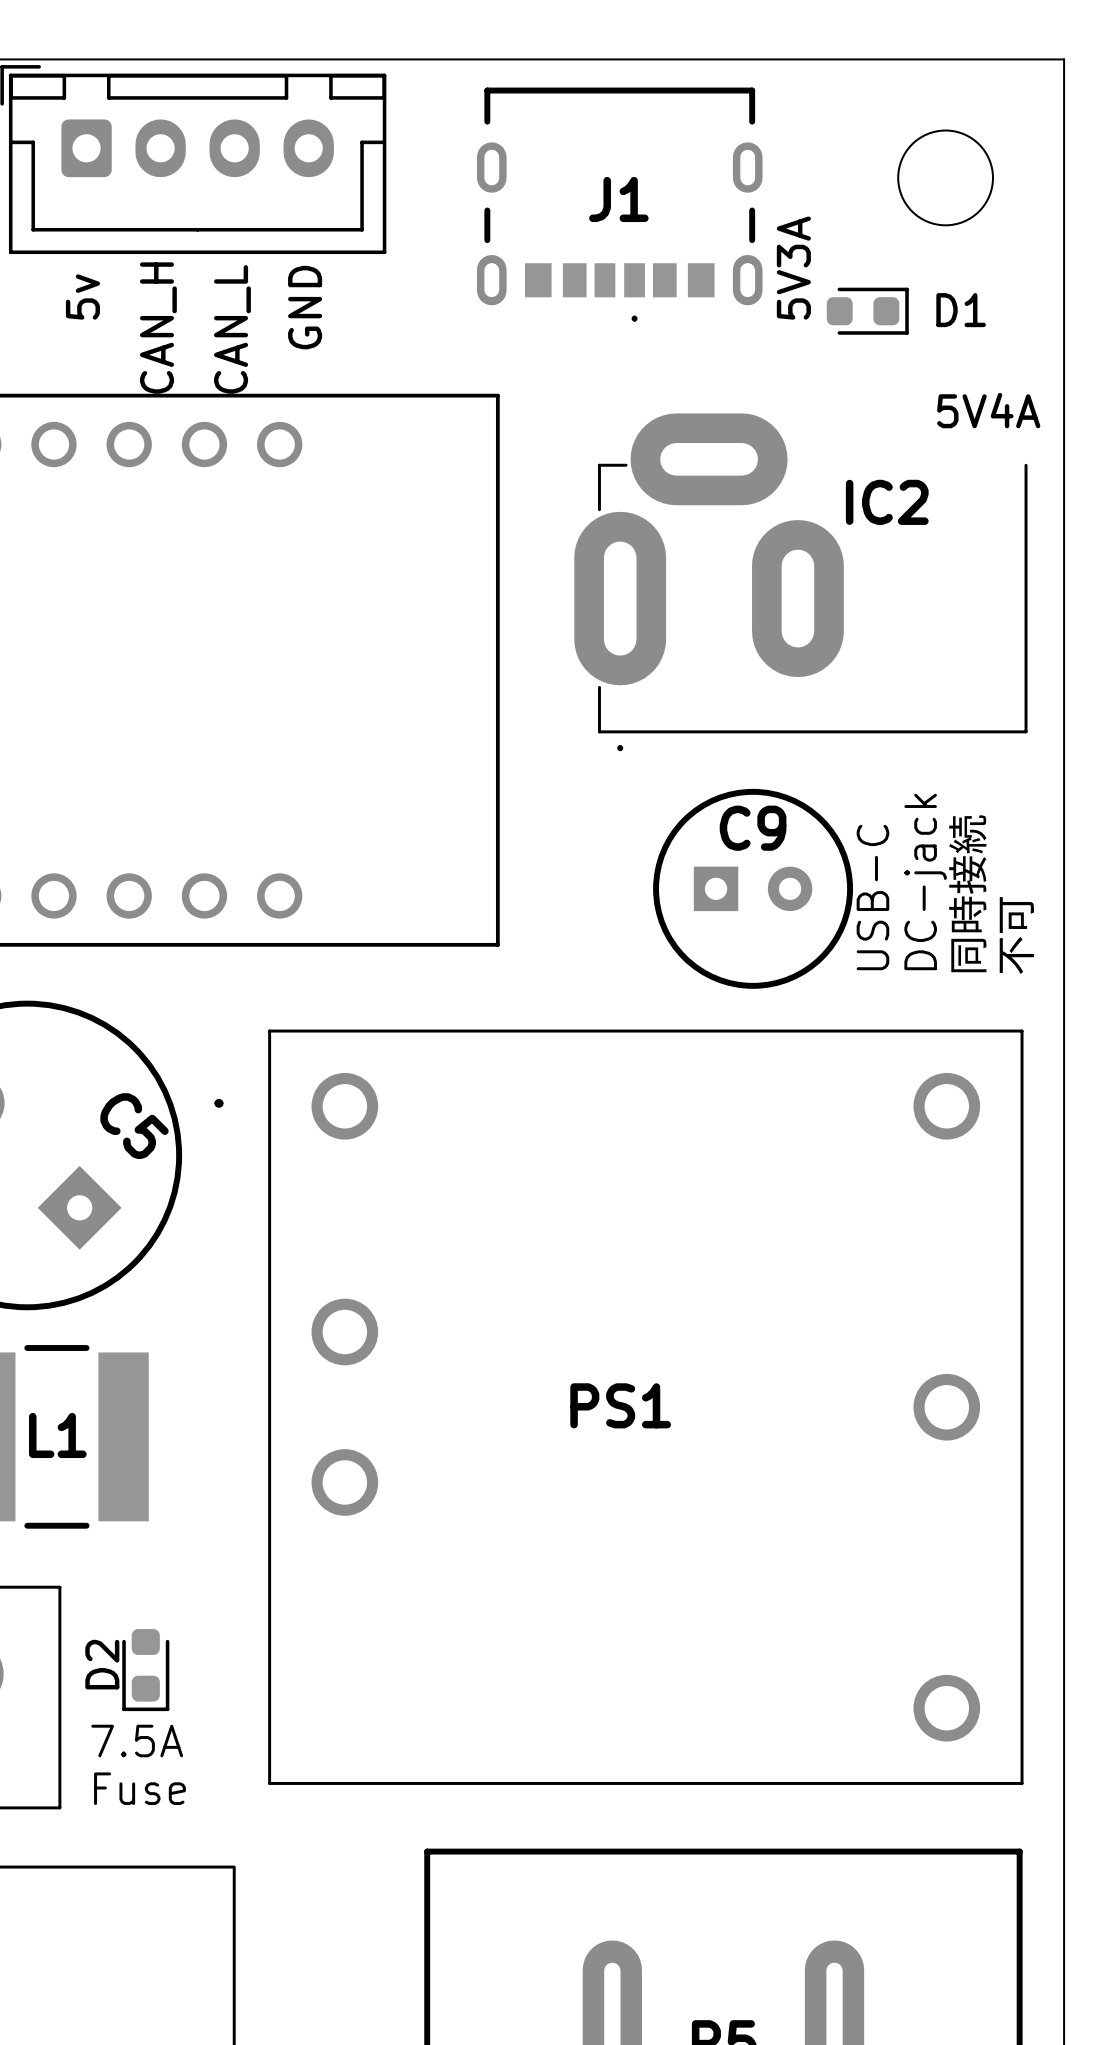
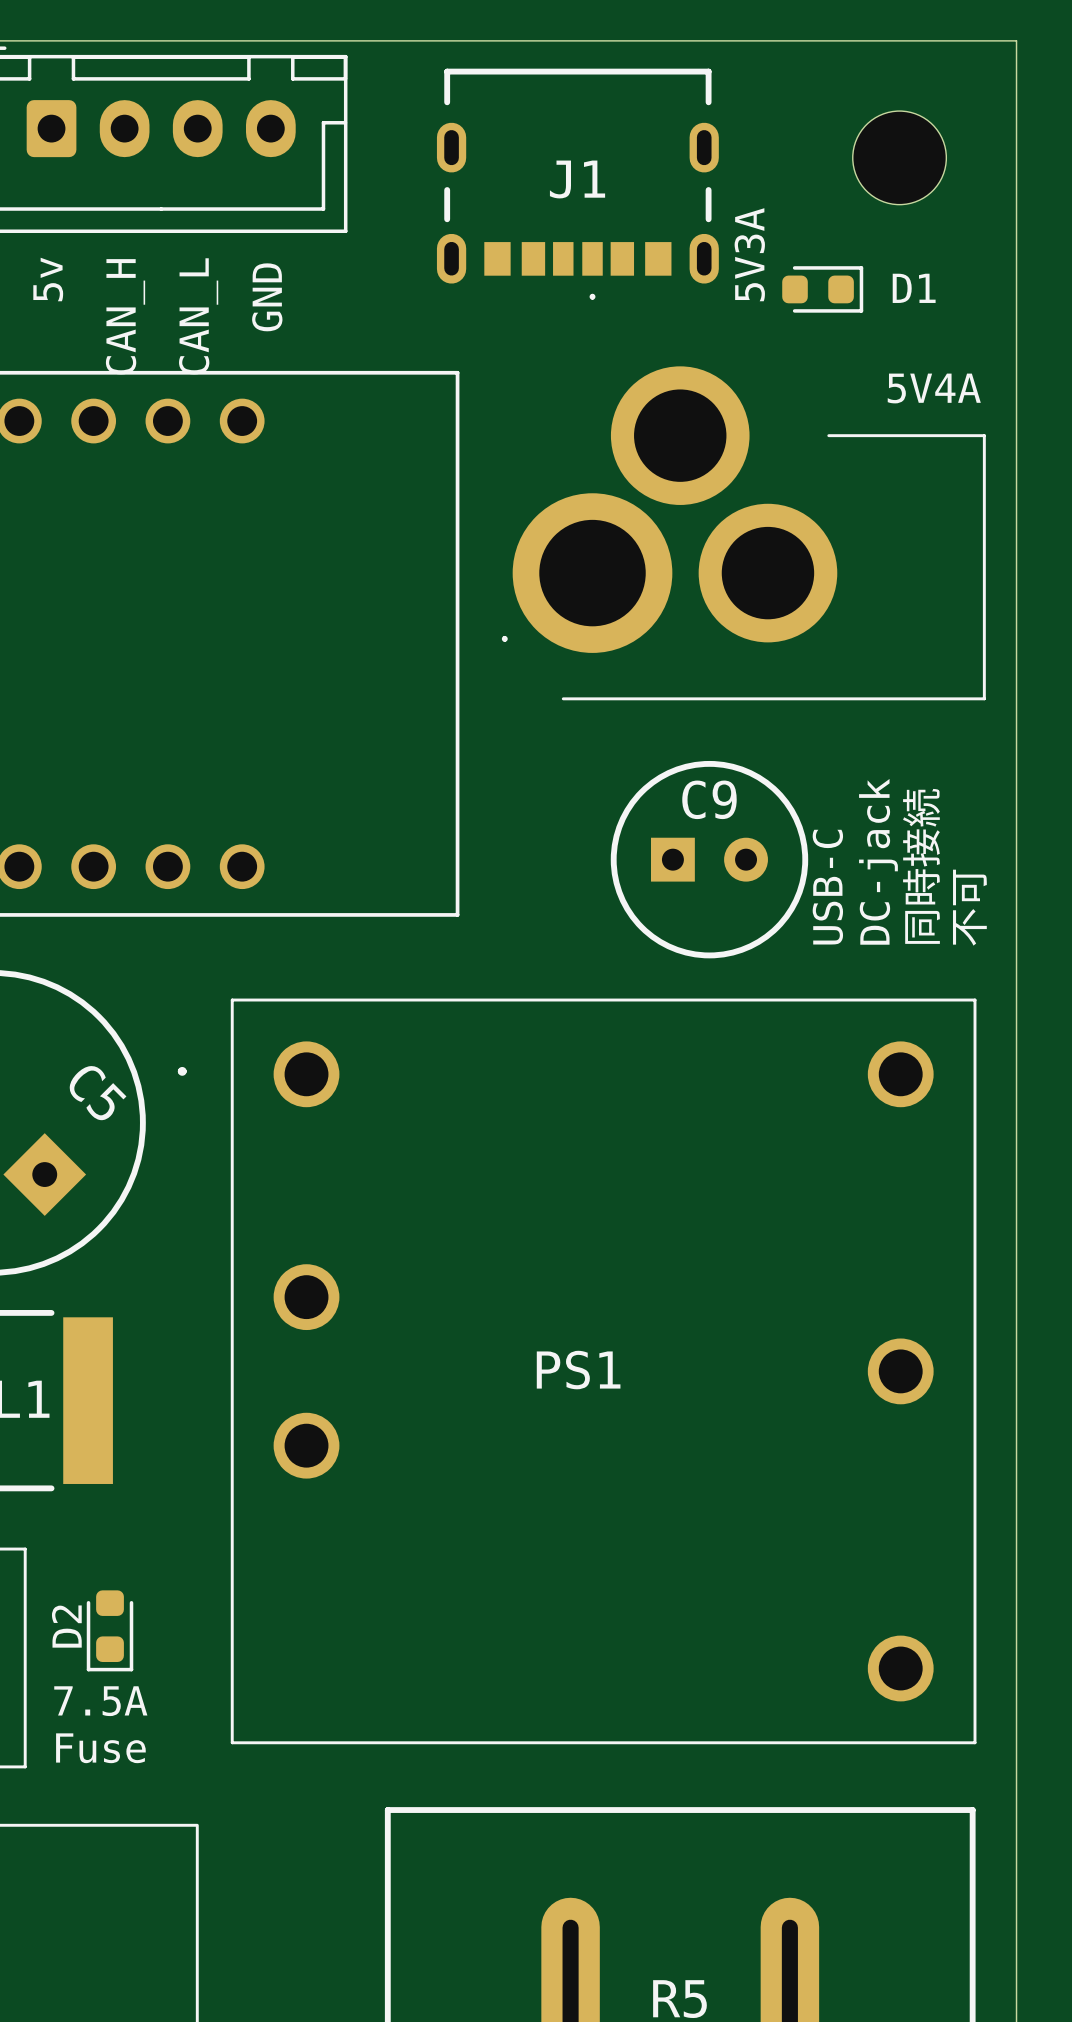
part: none -> (743, 533)
IC2: (800, 582) -> none

